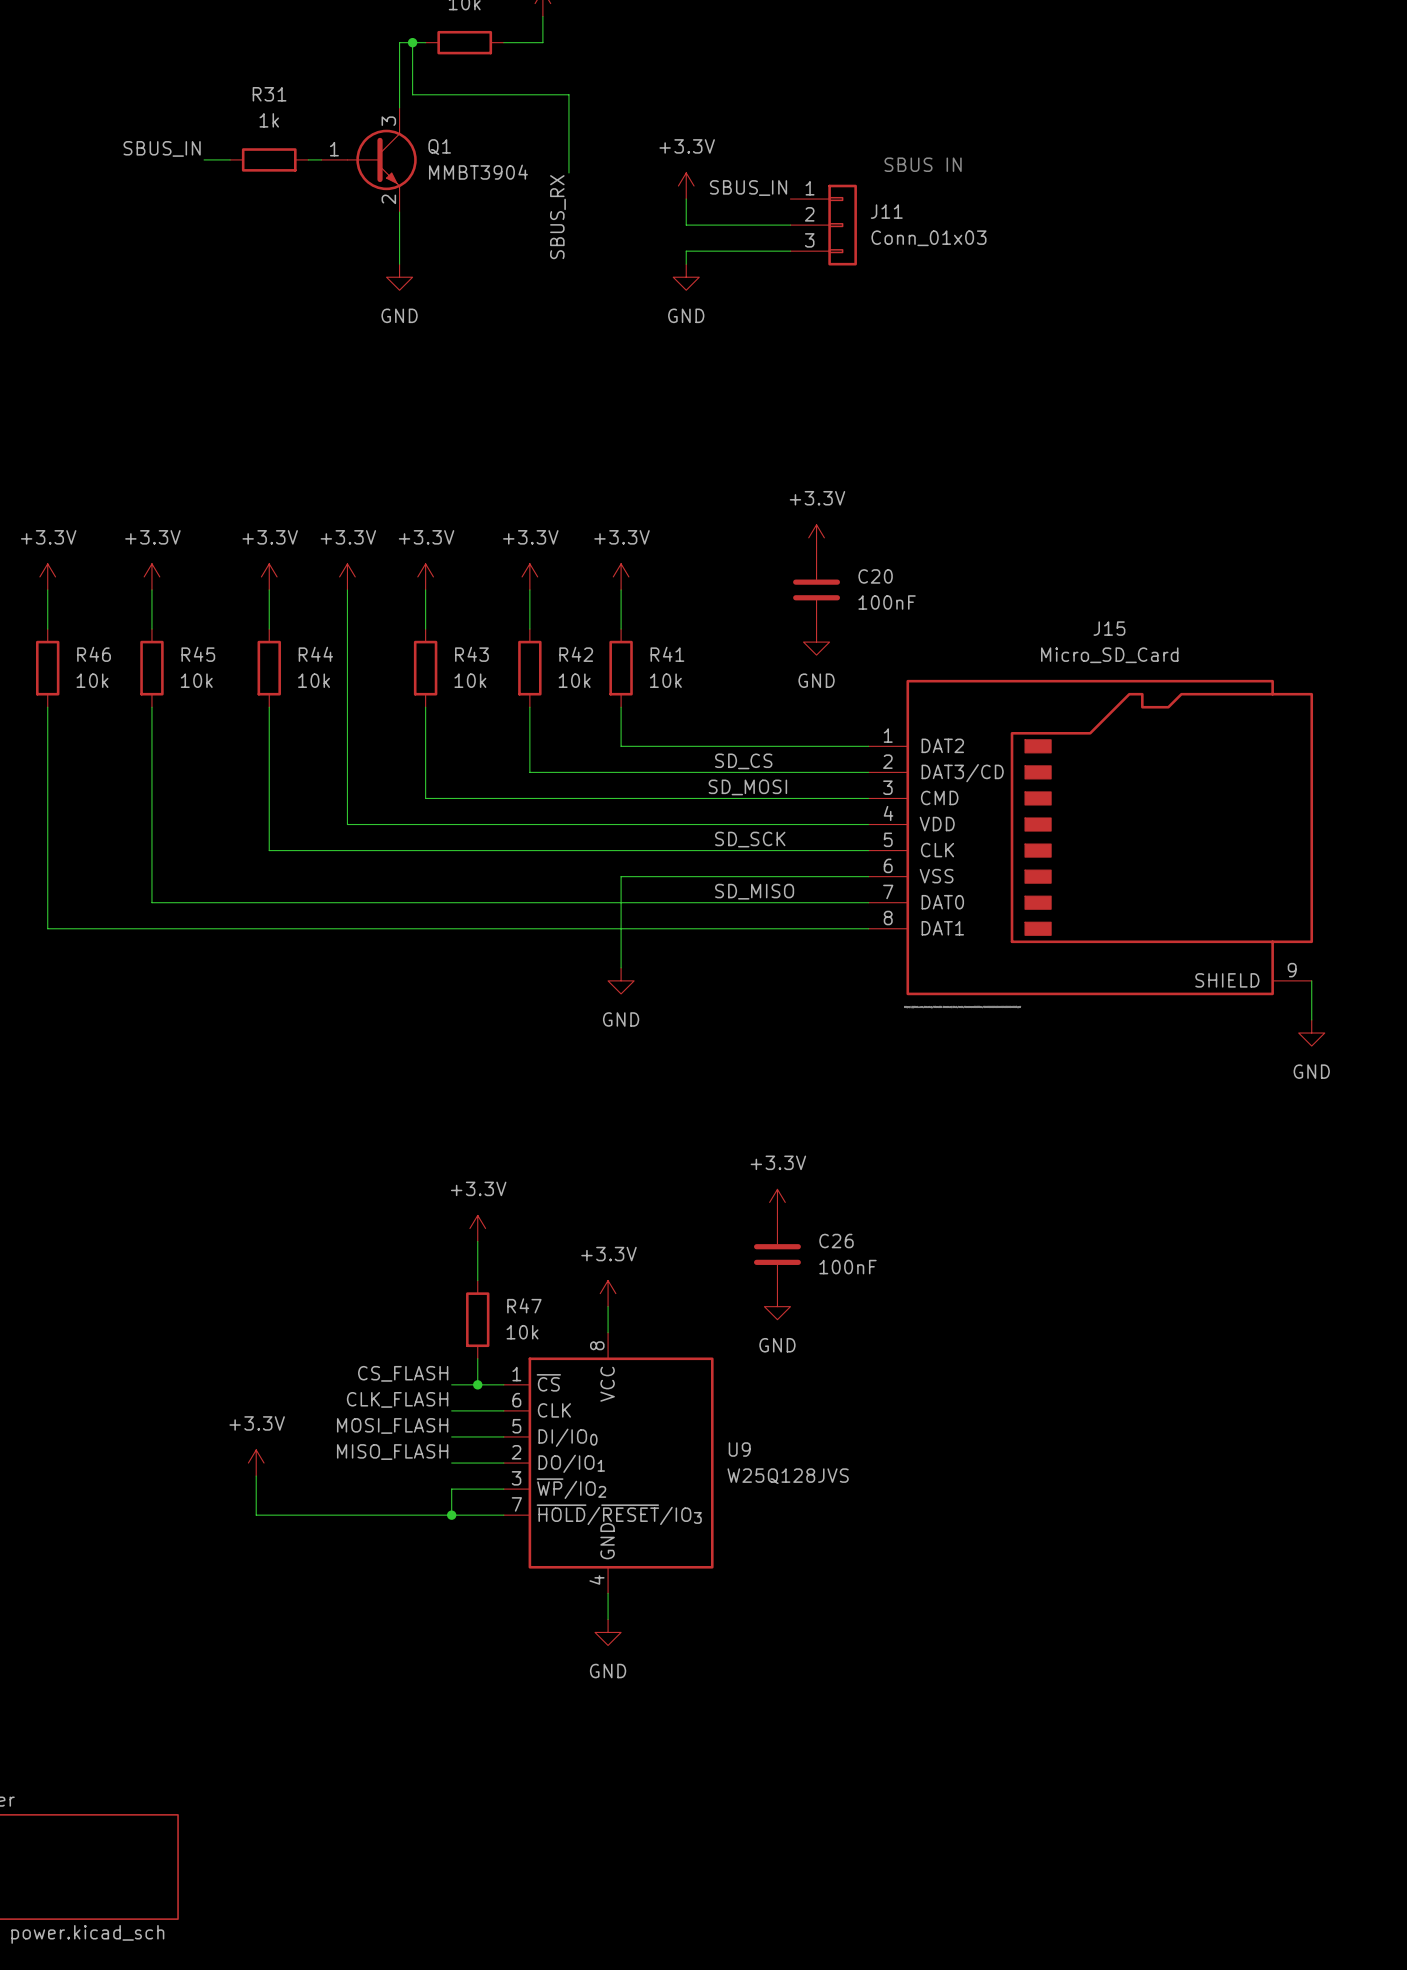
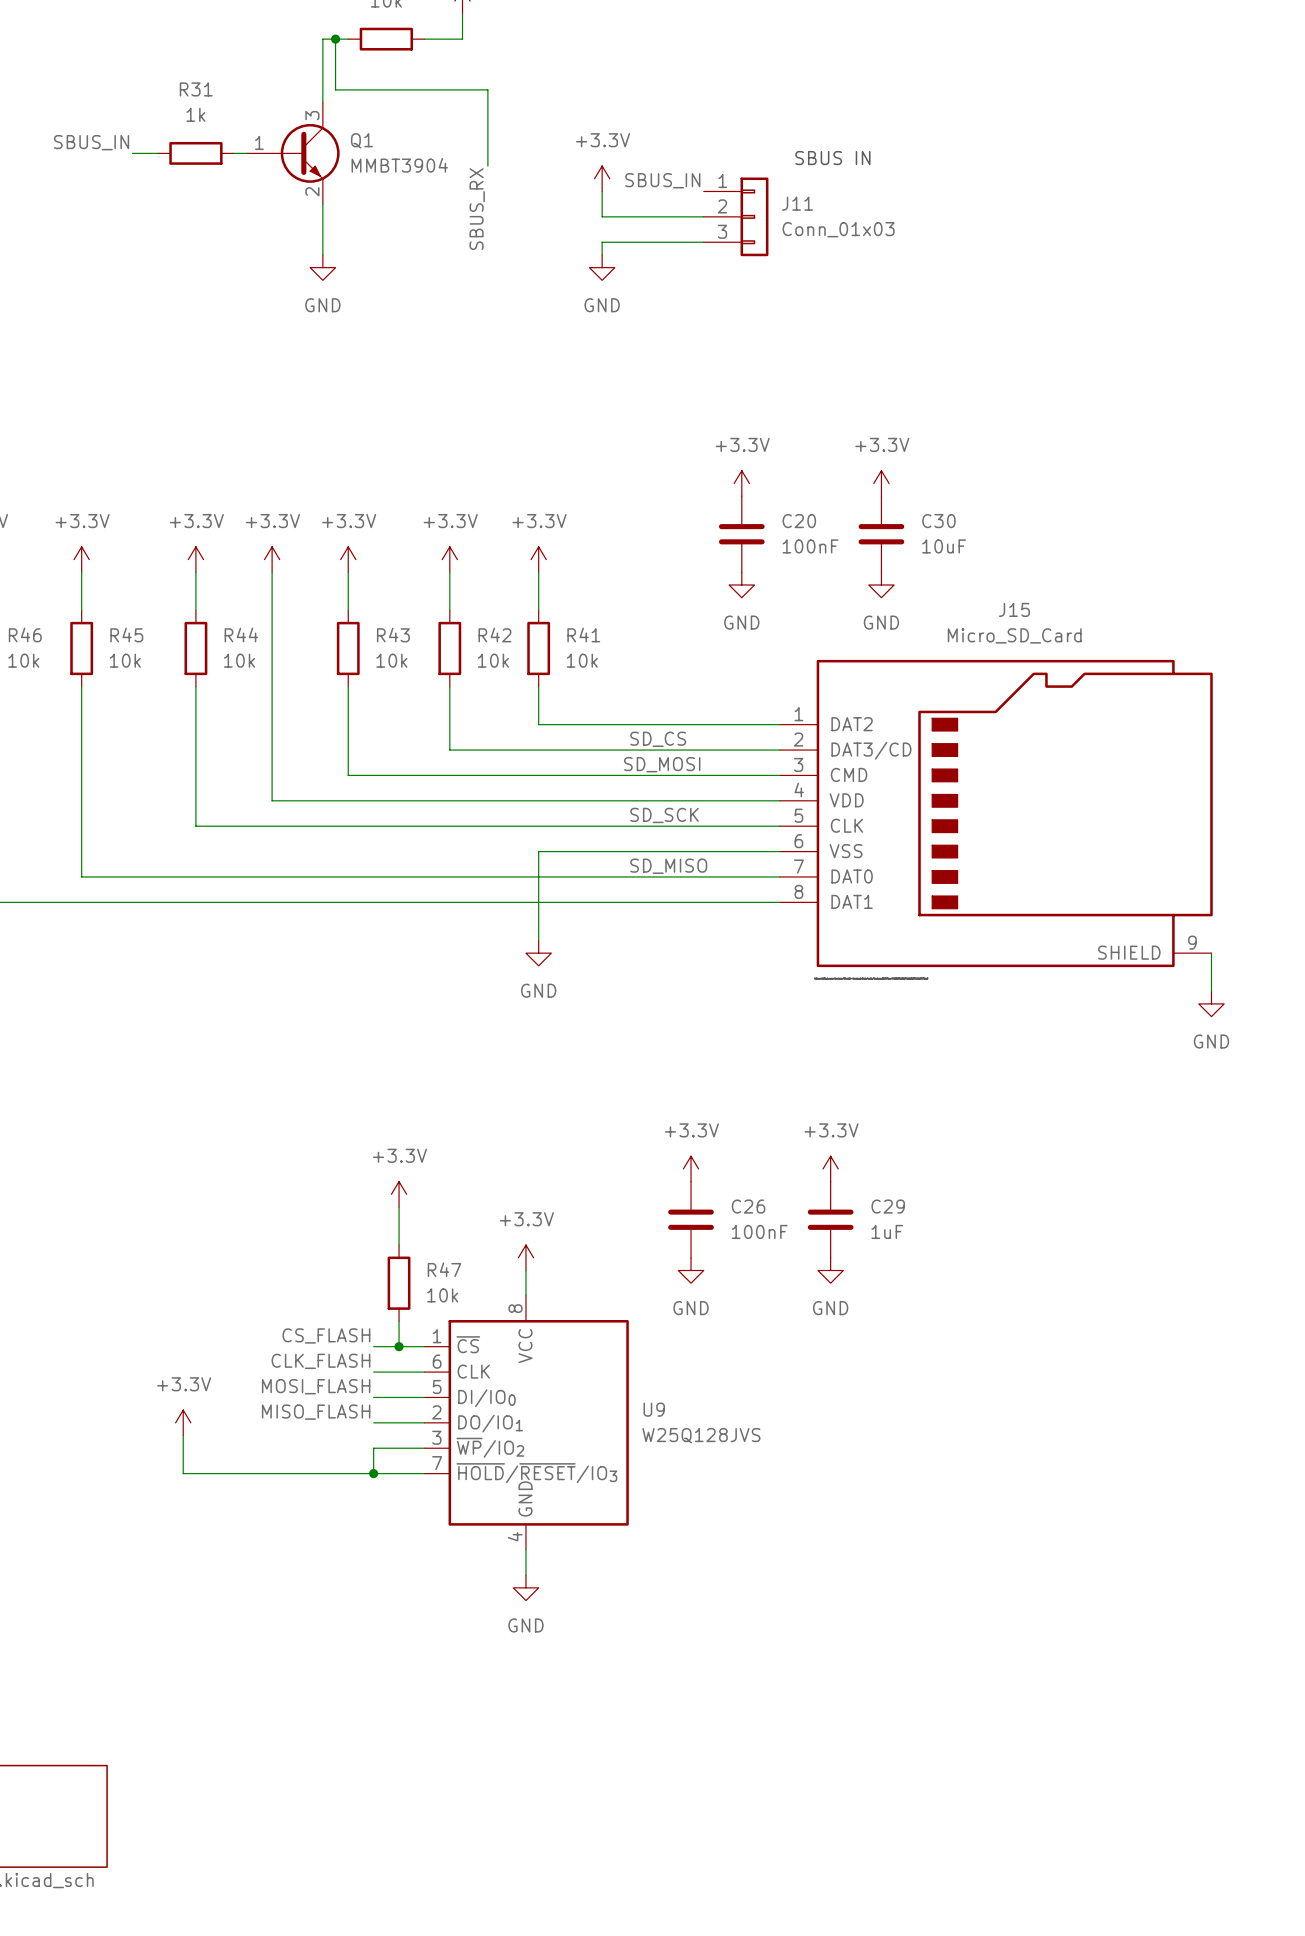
power symbol: none -> +3.3V (881, 483)
power symbol position: +3.3V (816, 537) -> +3.3V (741, 483)
C30: none -> 10uF (881, 534)
C20 position: (816, 589) -> (741, 534)
power symbol: none -> GND (881, 585)
power symbol position: GND (816, 642) -> GND (741, 585)
power symbol: none -> +3.3V (830, 1168)
C29: none -> 1uF (830, 1219)
power symbol: none -> GND (830, 1270)

